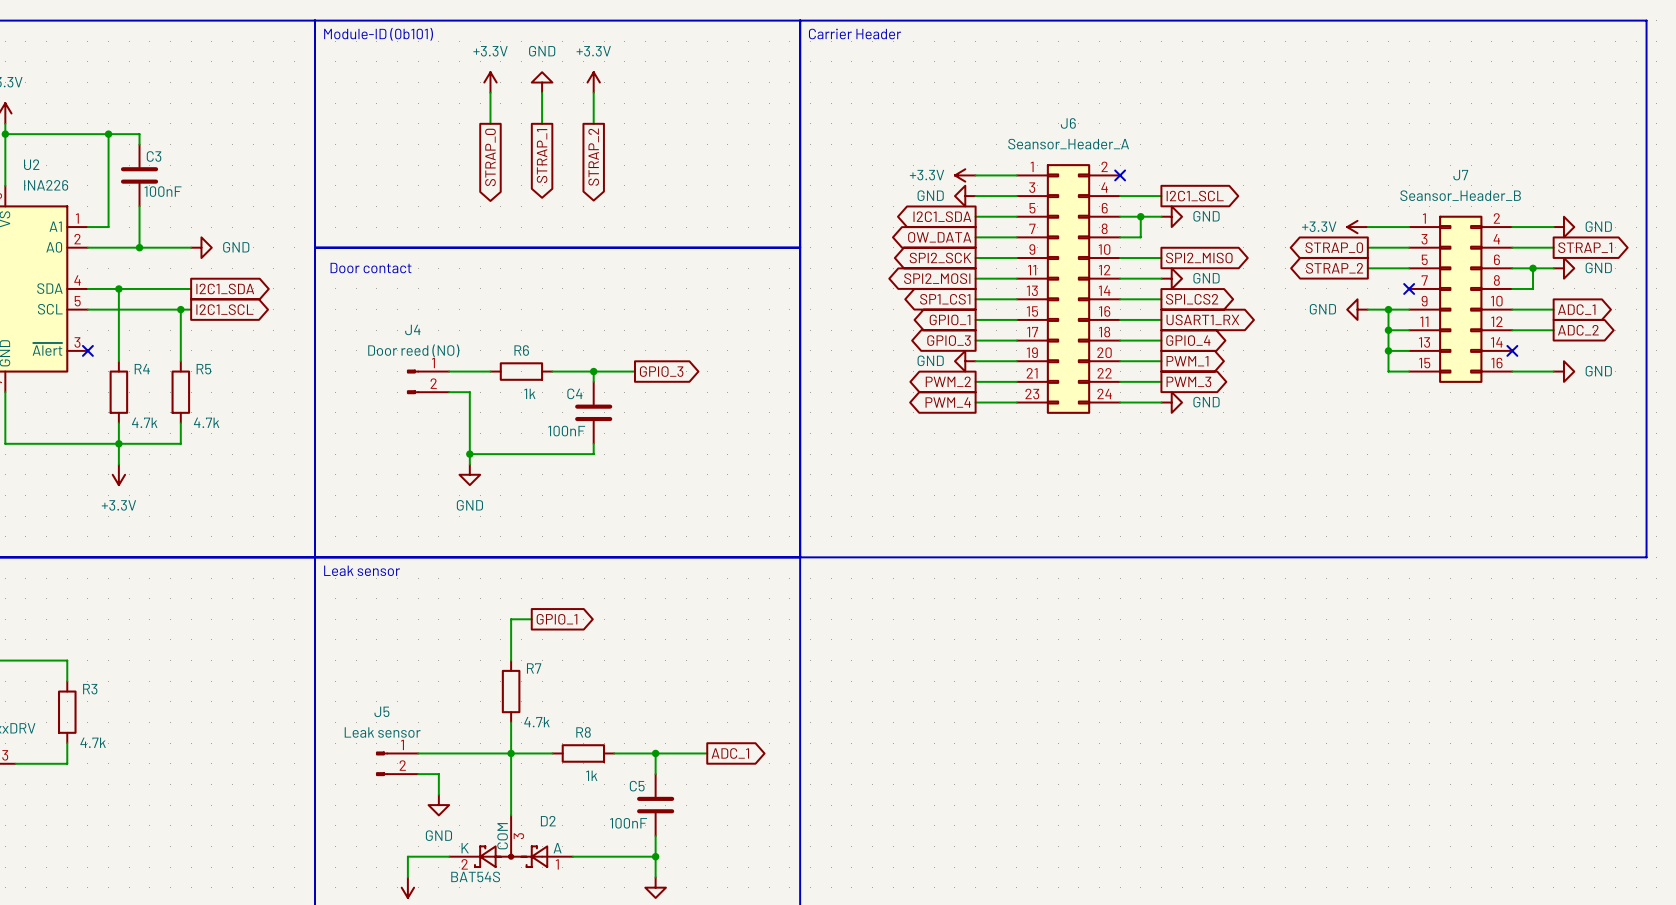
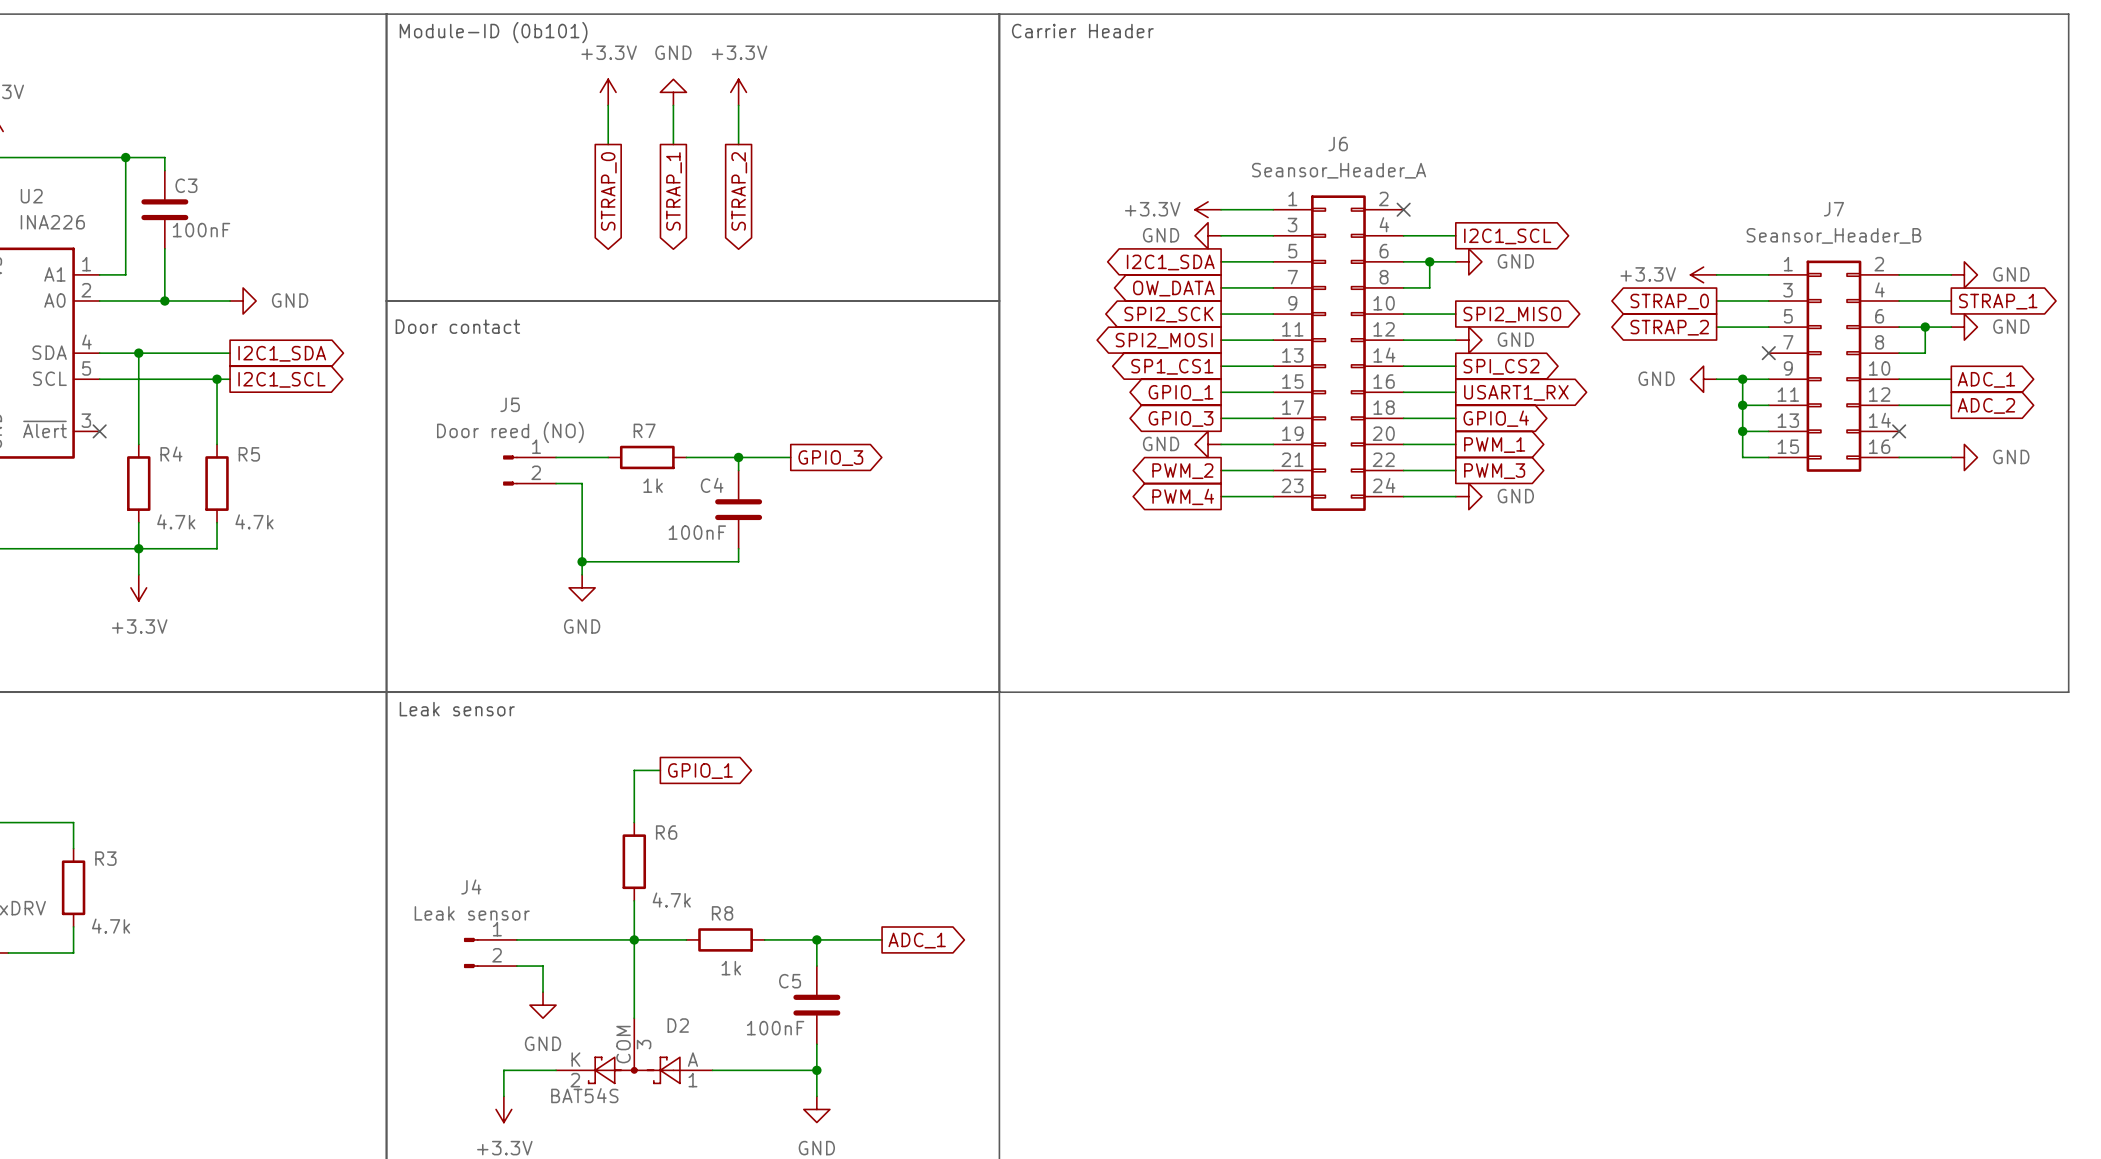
J4 name: J4 (412, 329) -> J5 (510, 404)
R6 name: R6 (521, 350) -> R7 (644, 430)
R7 name: R7 (534, 668) -> R6 (666, 832)
J5 name: J5 (381, 711) -> J4 (471, 886)

